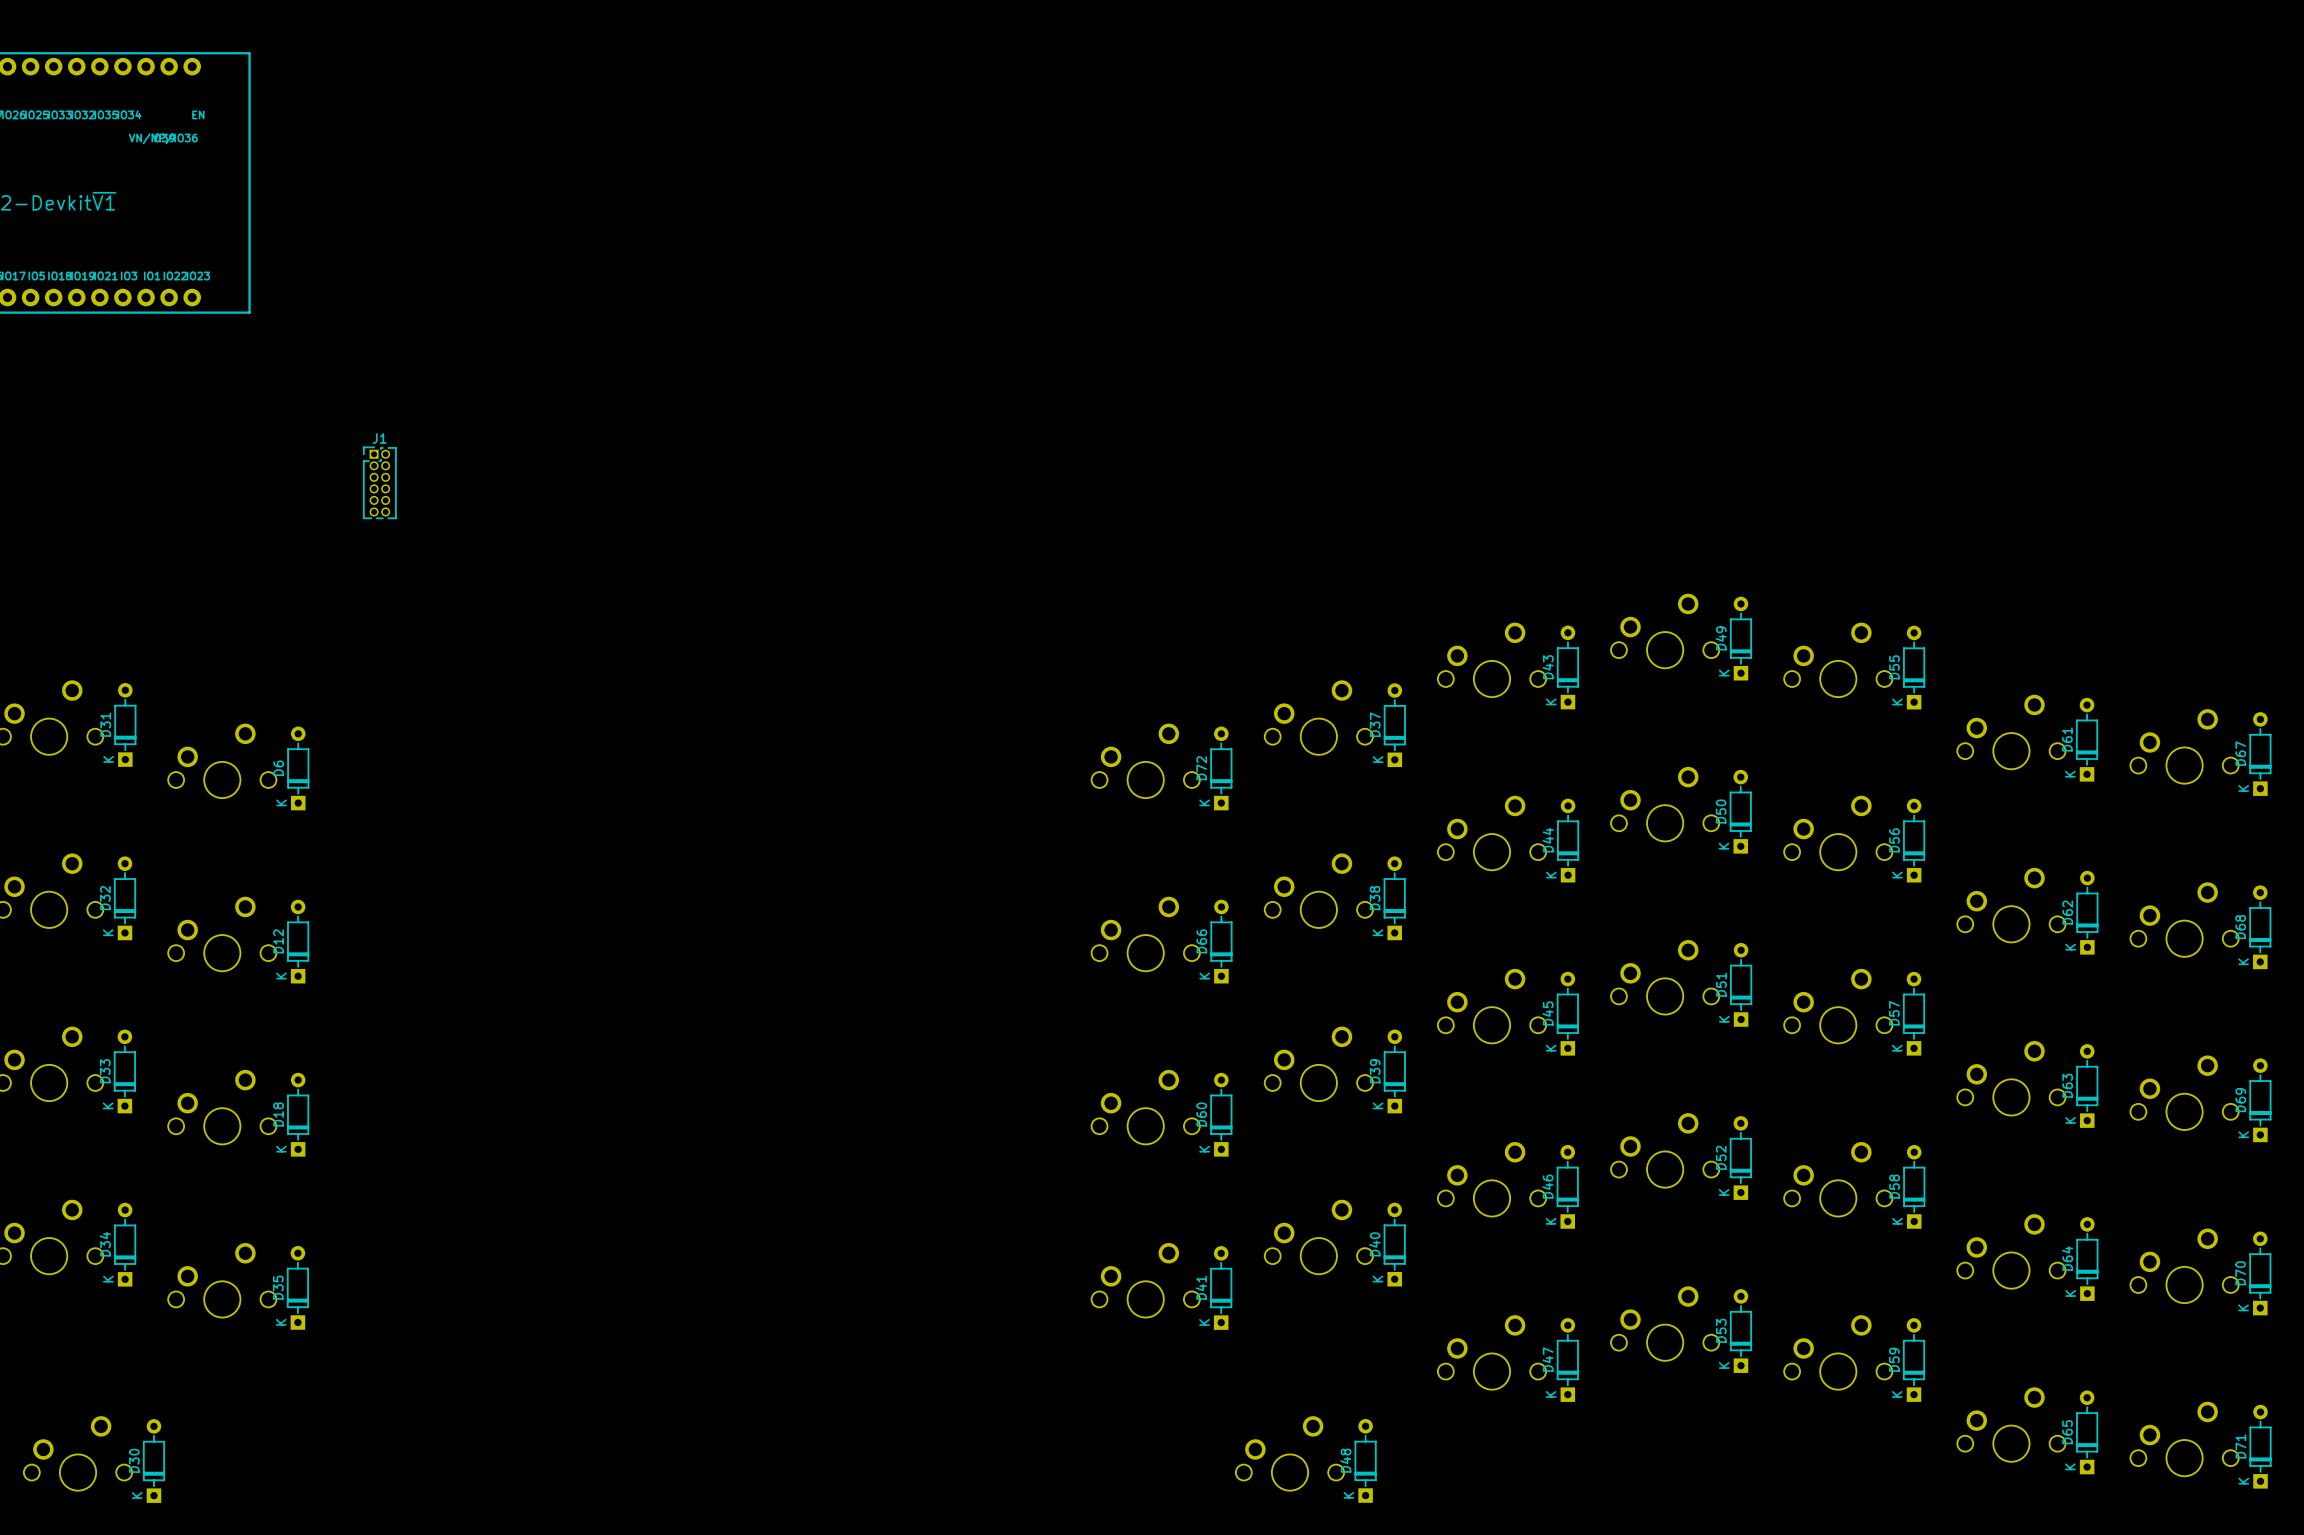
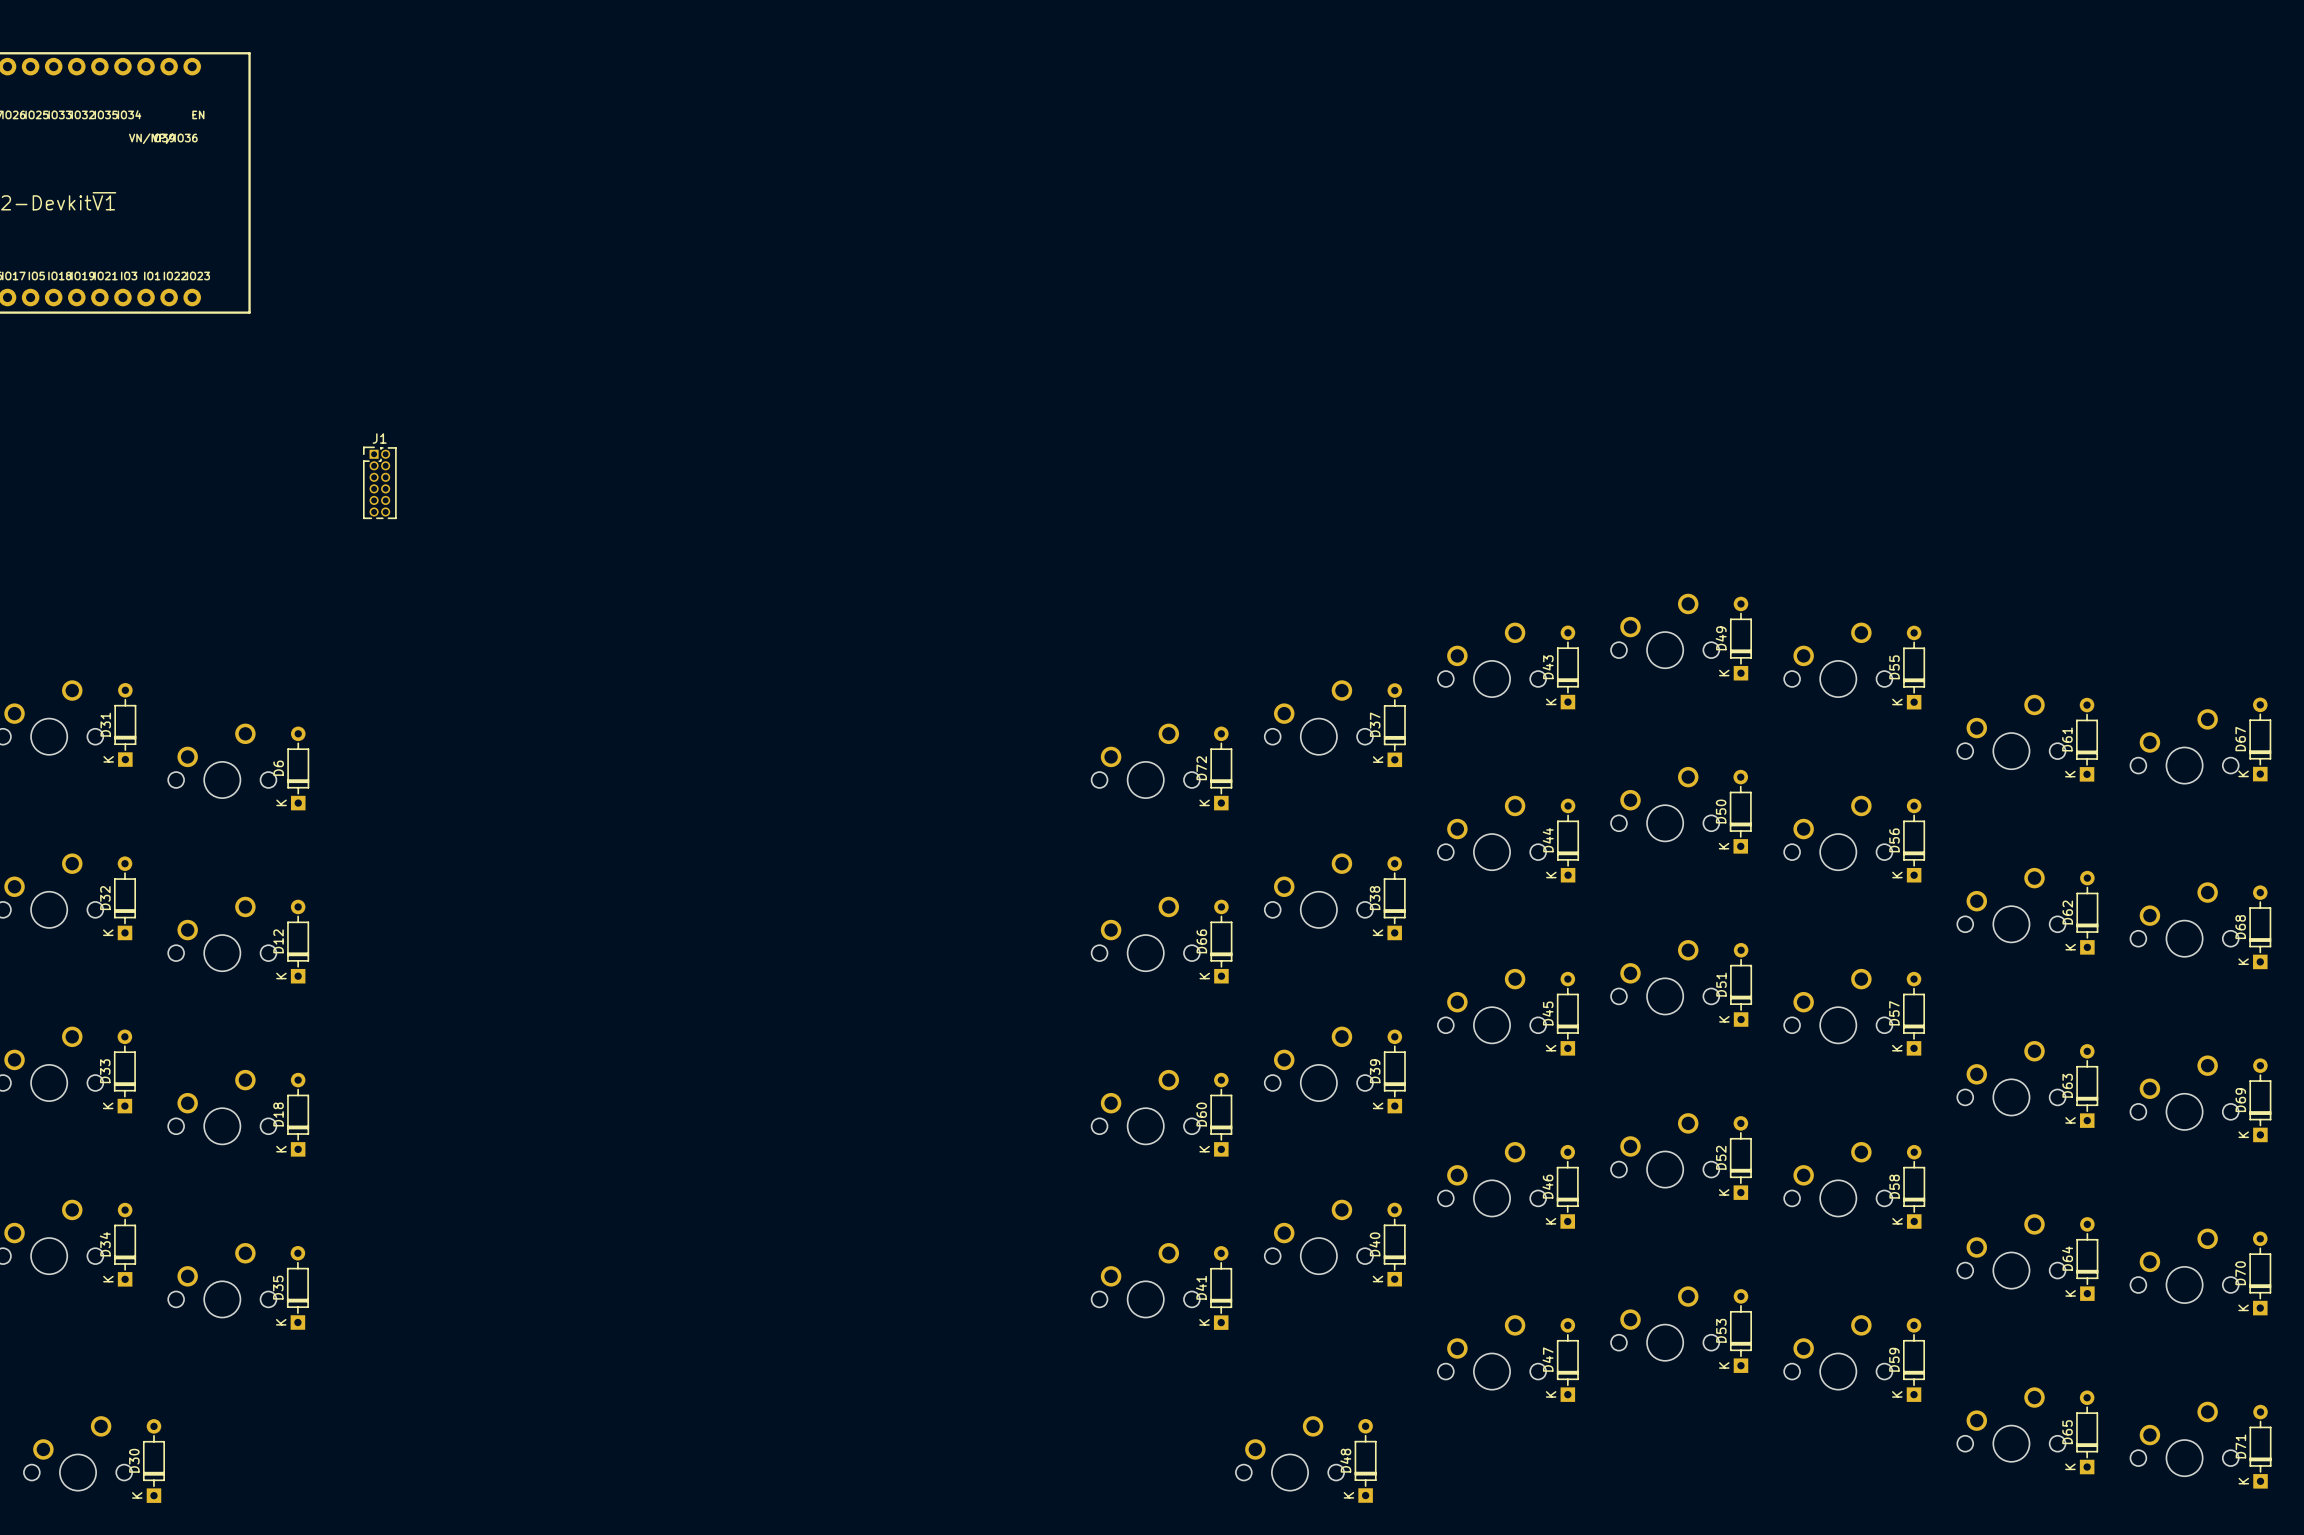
D67 position: (2260, 754) -> (2260, 739)

